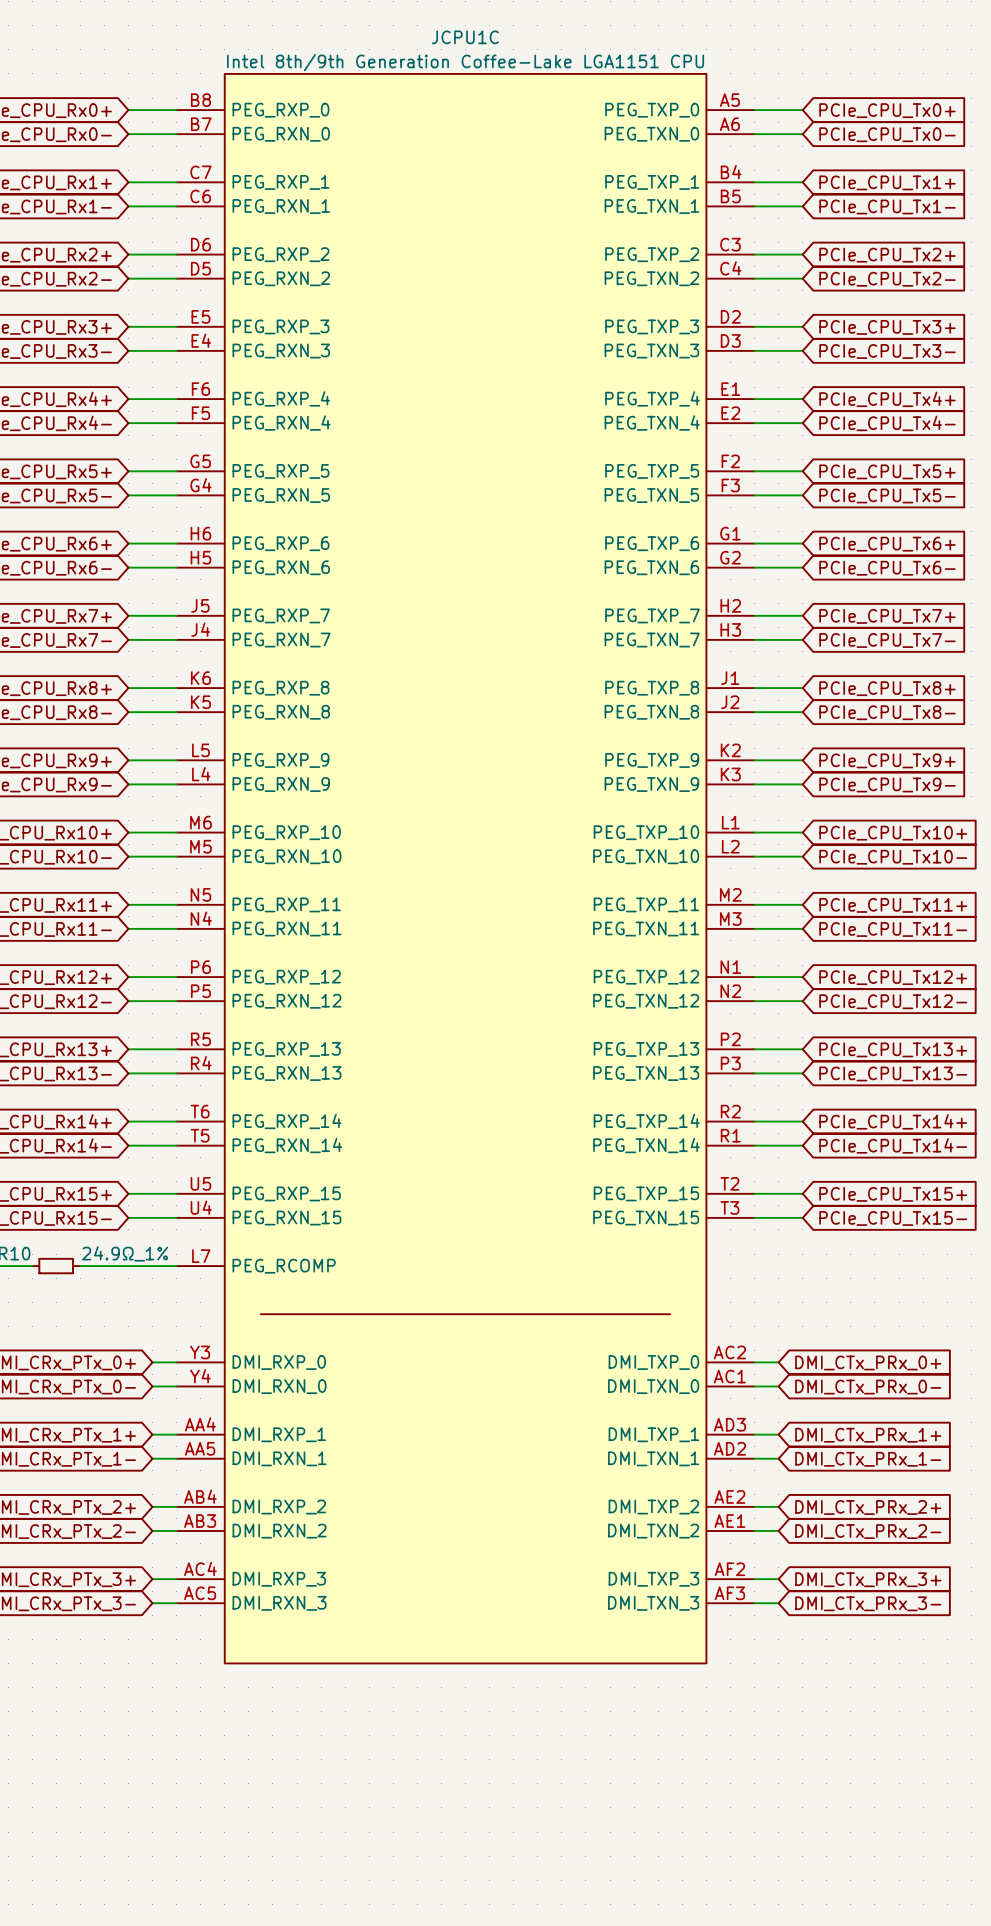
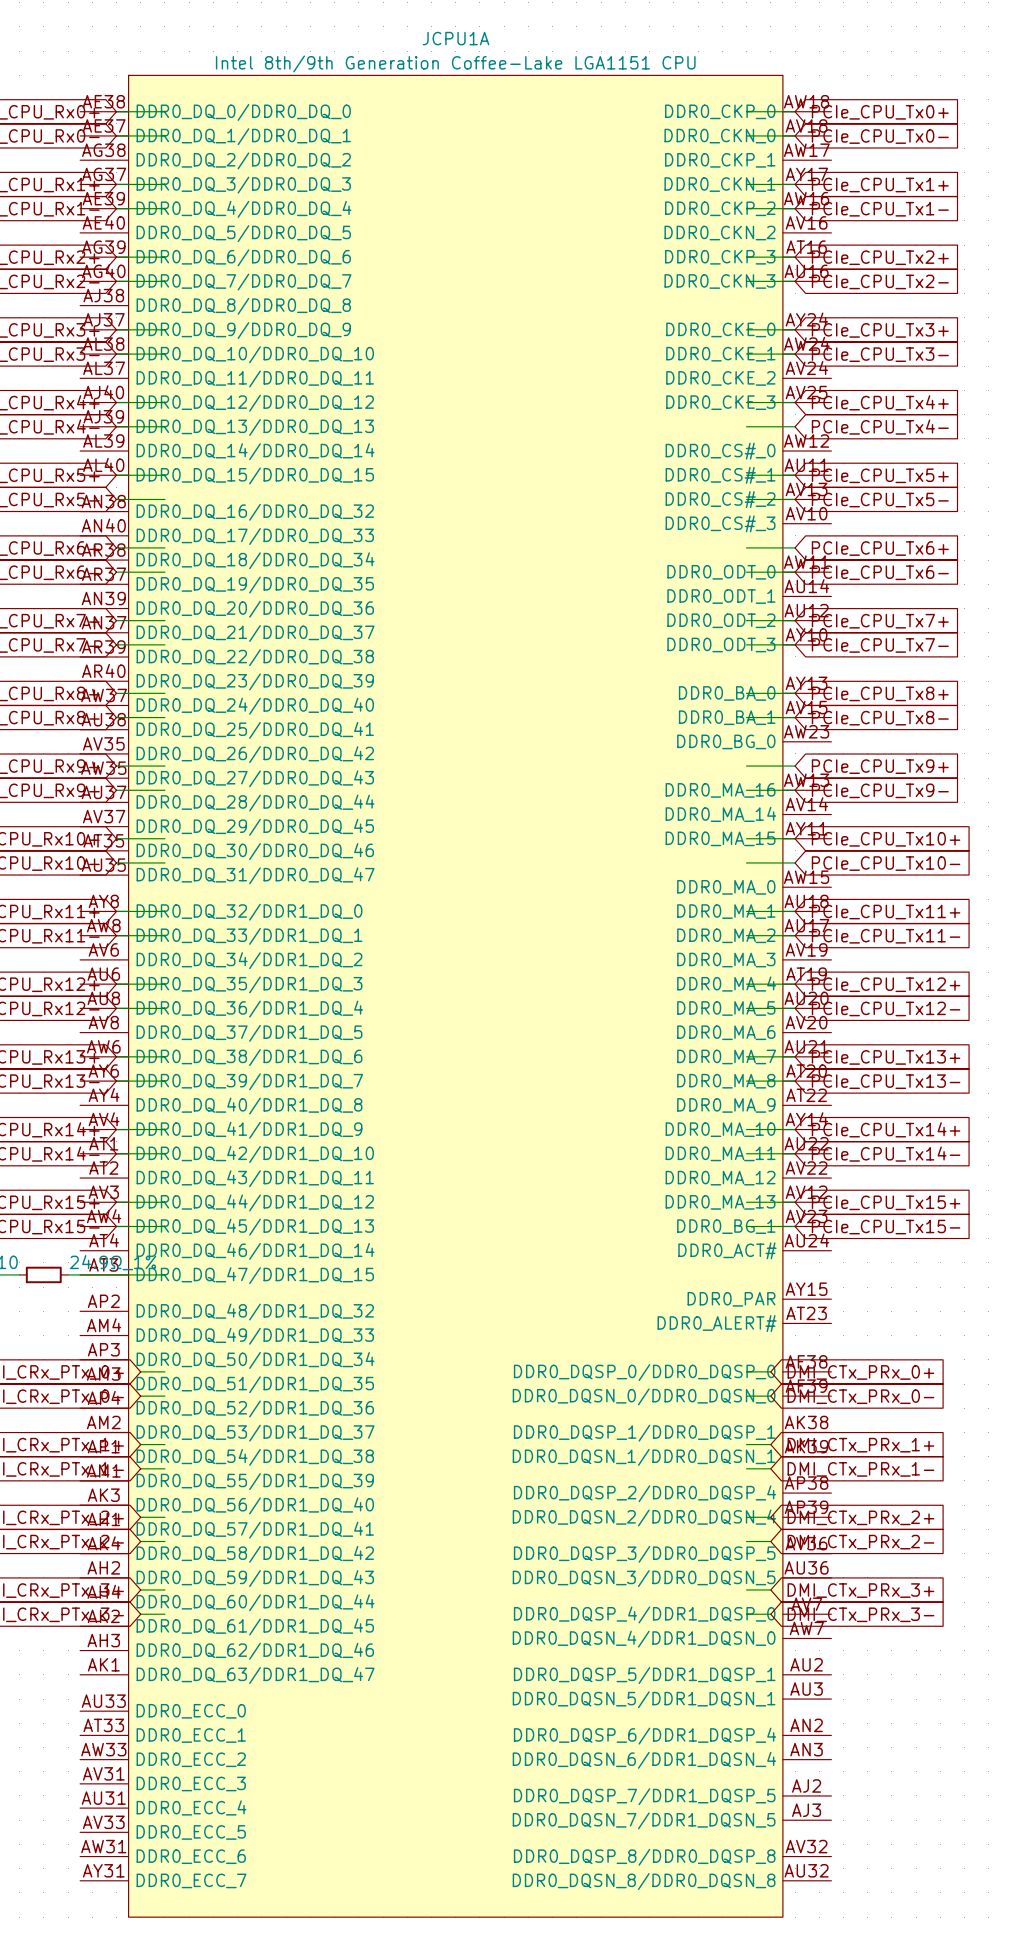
JCPU1C: Intel 8th/9th Generation Coffee-Lake LGA1151 CPU (465, 868) -> none
JCPU1A: none -> Intel 8th/9th Generation Coffee-Lake LGA1151 CPU (455, 996)

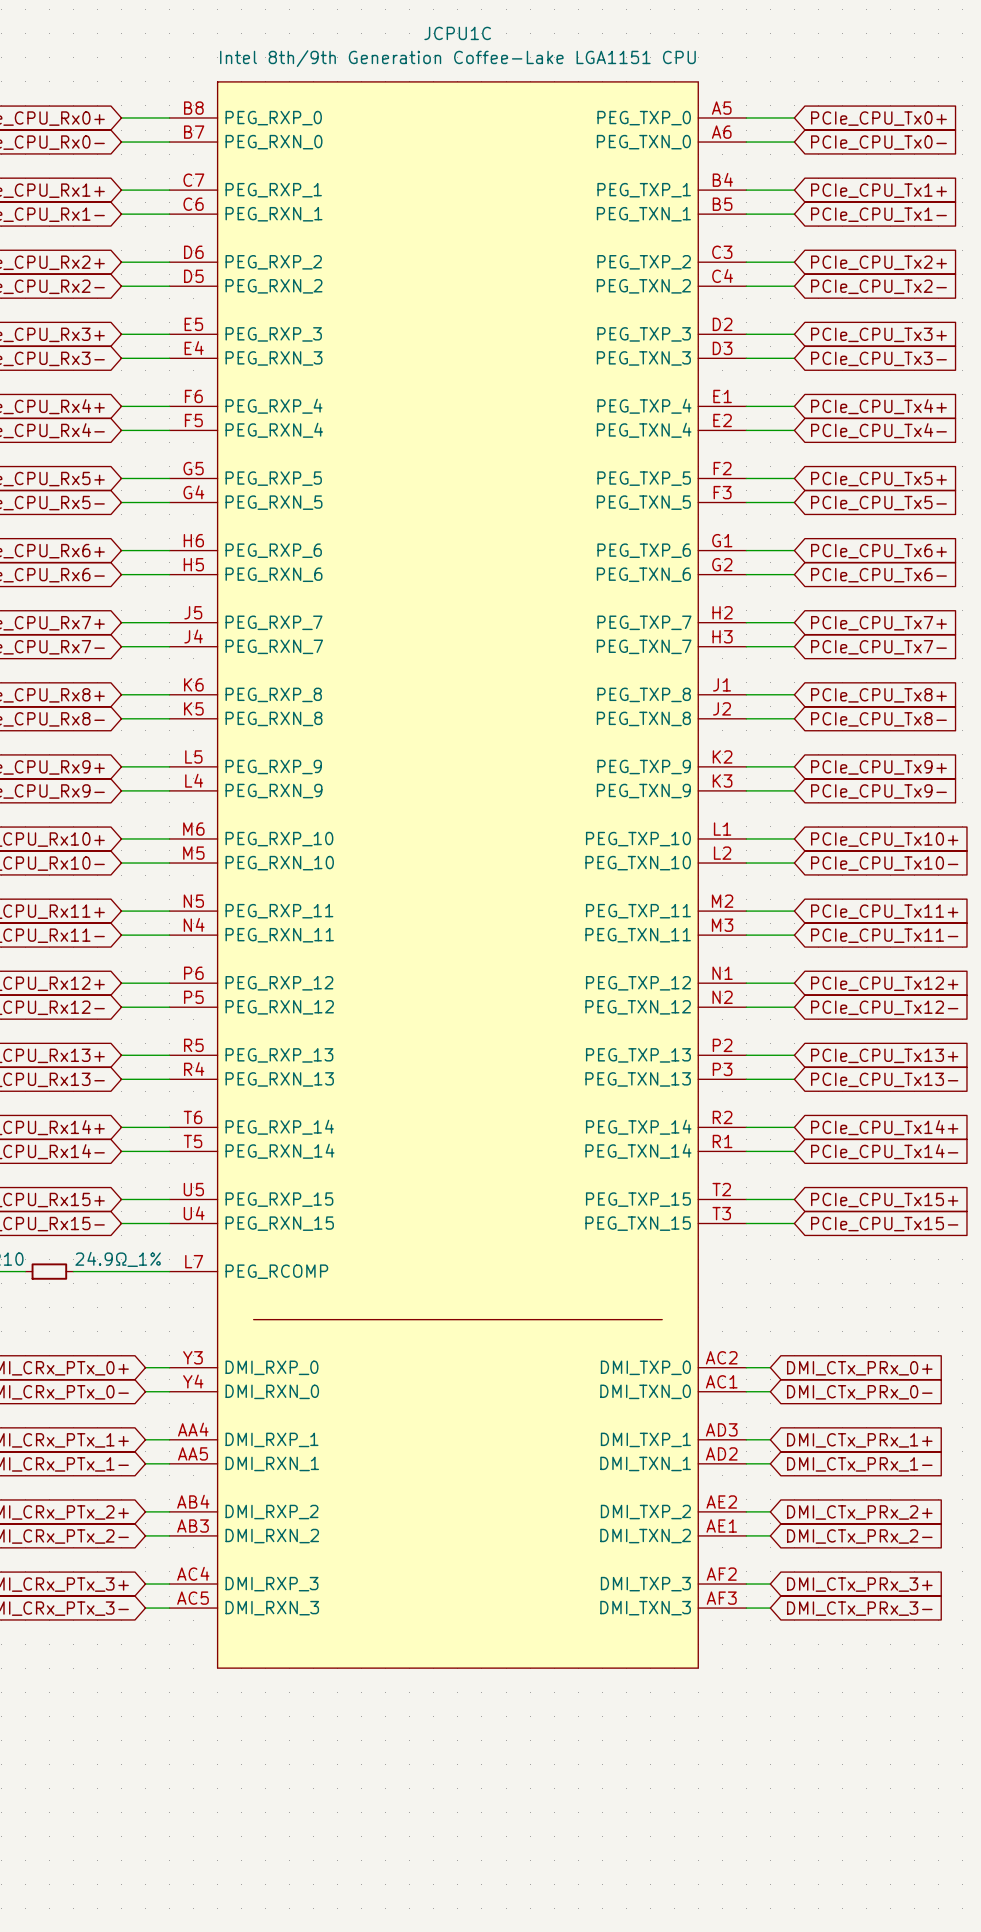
JCPU1C: none -> Intel 8th/9th Generation Coffee-Lake LGA1151 CPU (457, 875)
JCPU1A: Intel 8th/9th Generation Coffee-Lake LGA1151 CPU (455, 996) -> none

